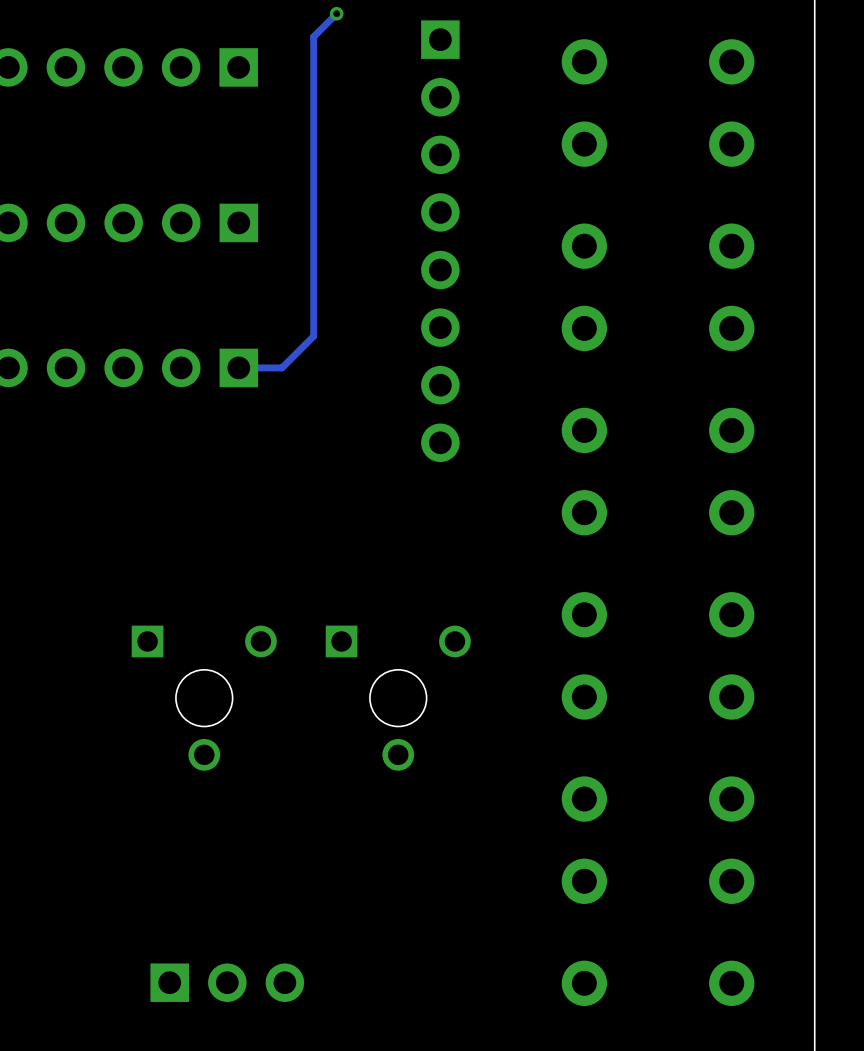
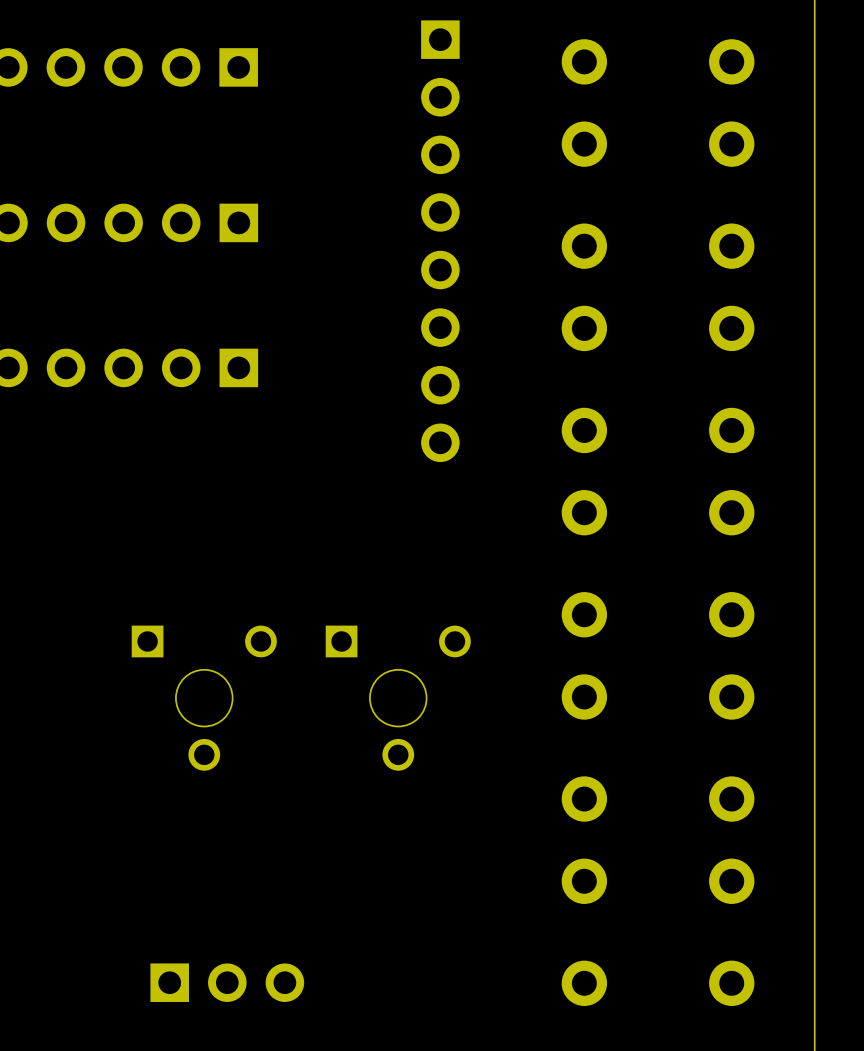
track: (336, 13) (313, 36) (313, 336) (282, 367) (238, 367) -> none
via: (336, 13) -> none

